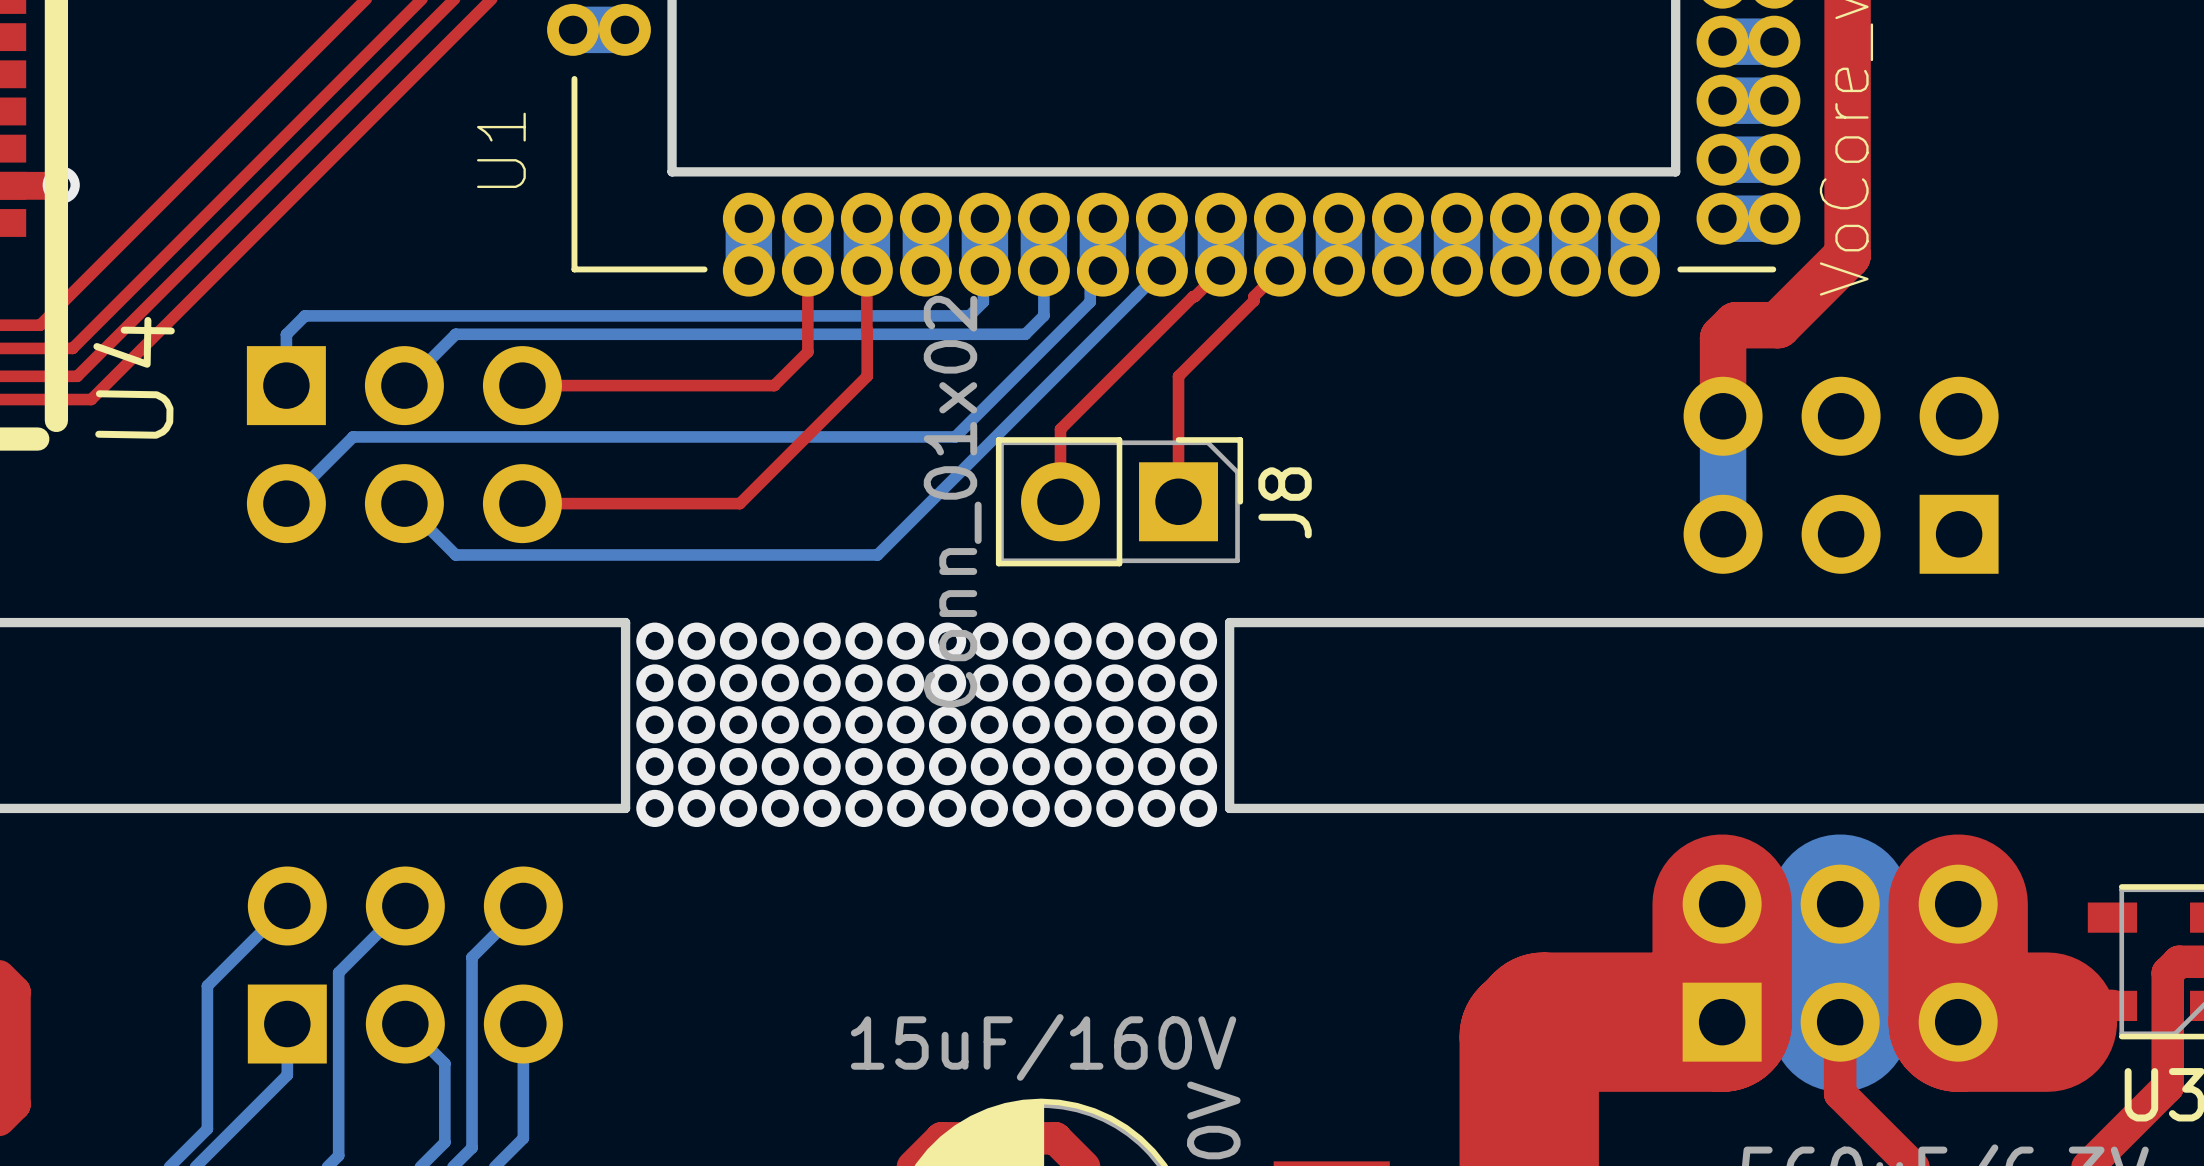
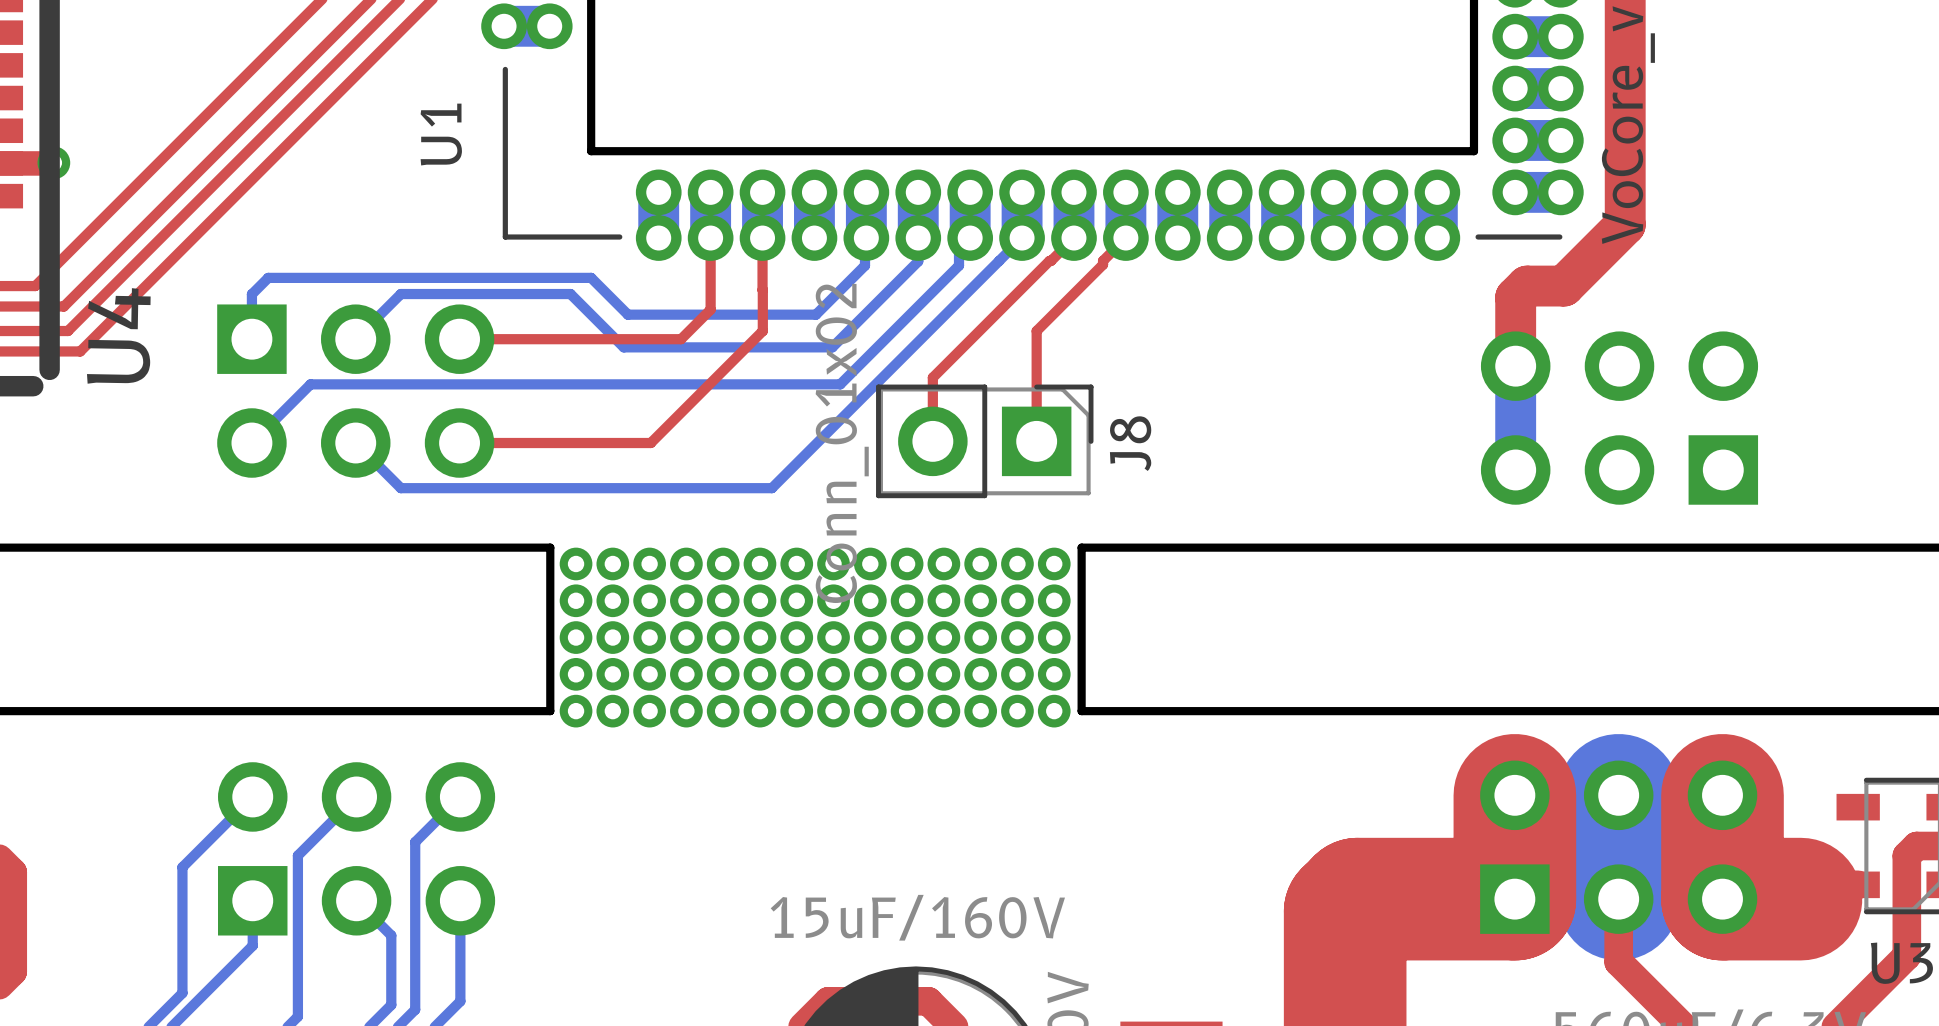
bottom track: (1043, 297) (1043, 315) (1025, 334) (648, 334) -> (918, 261) (832, 347) (623, 347) (570, 294)
bottom track: (672, 315) (969, 315) -> (591, 277) (627, 314) (815, 314) (852, 277)

